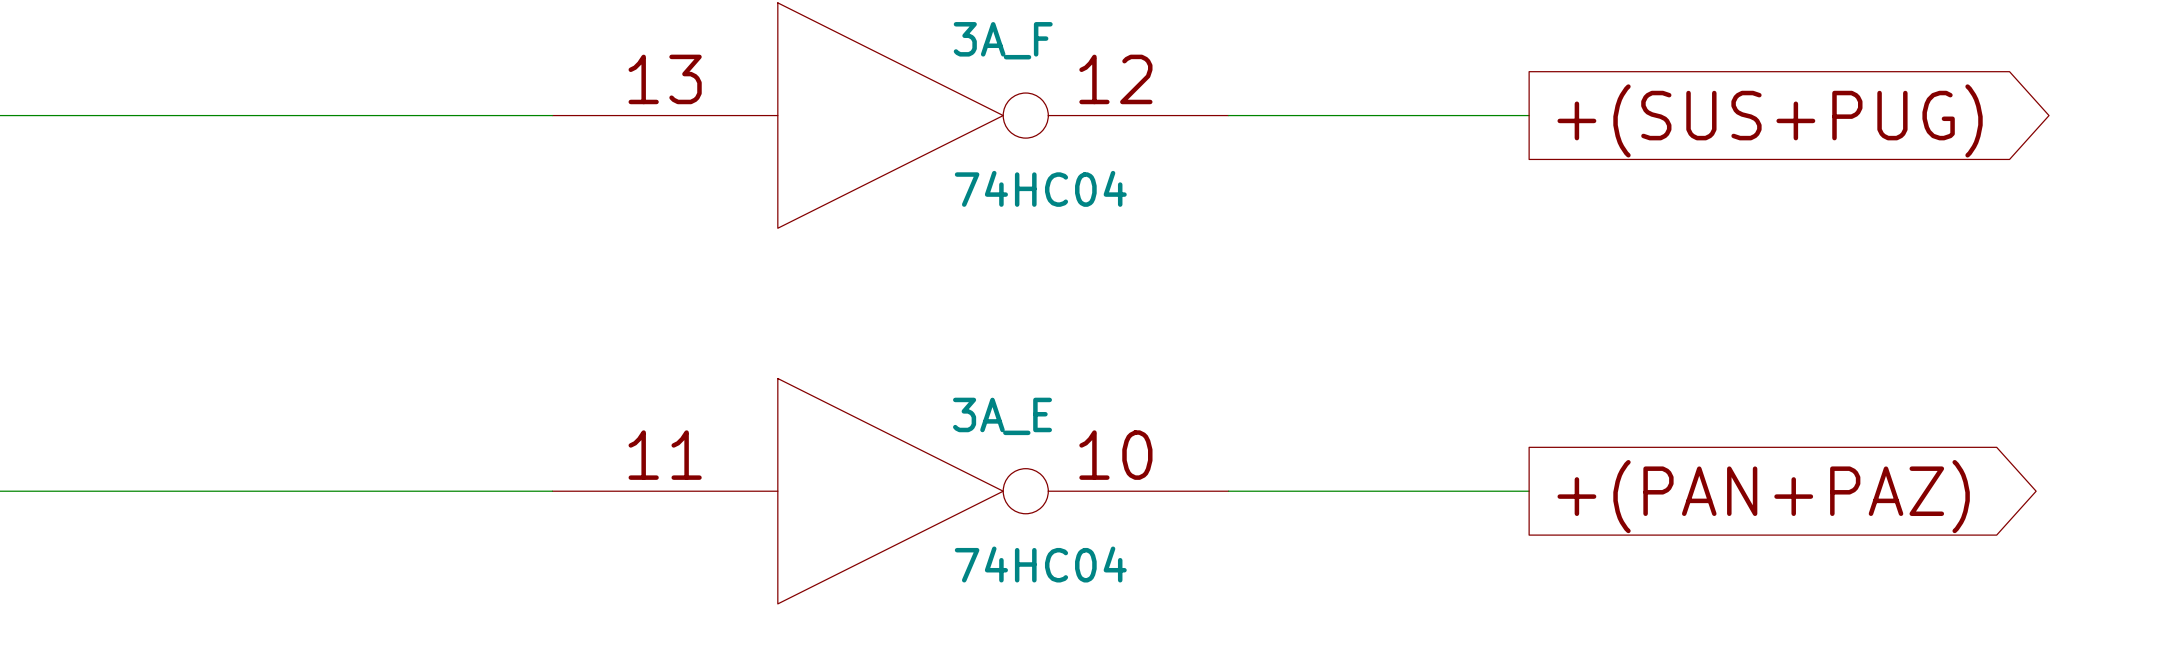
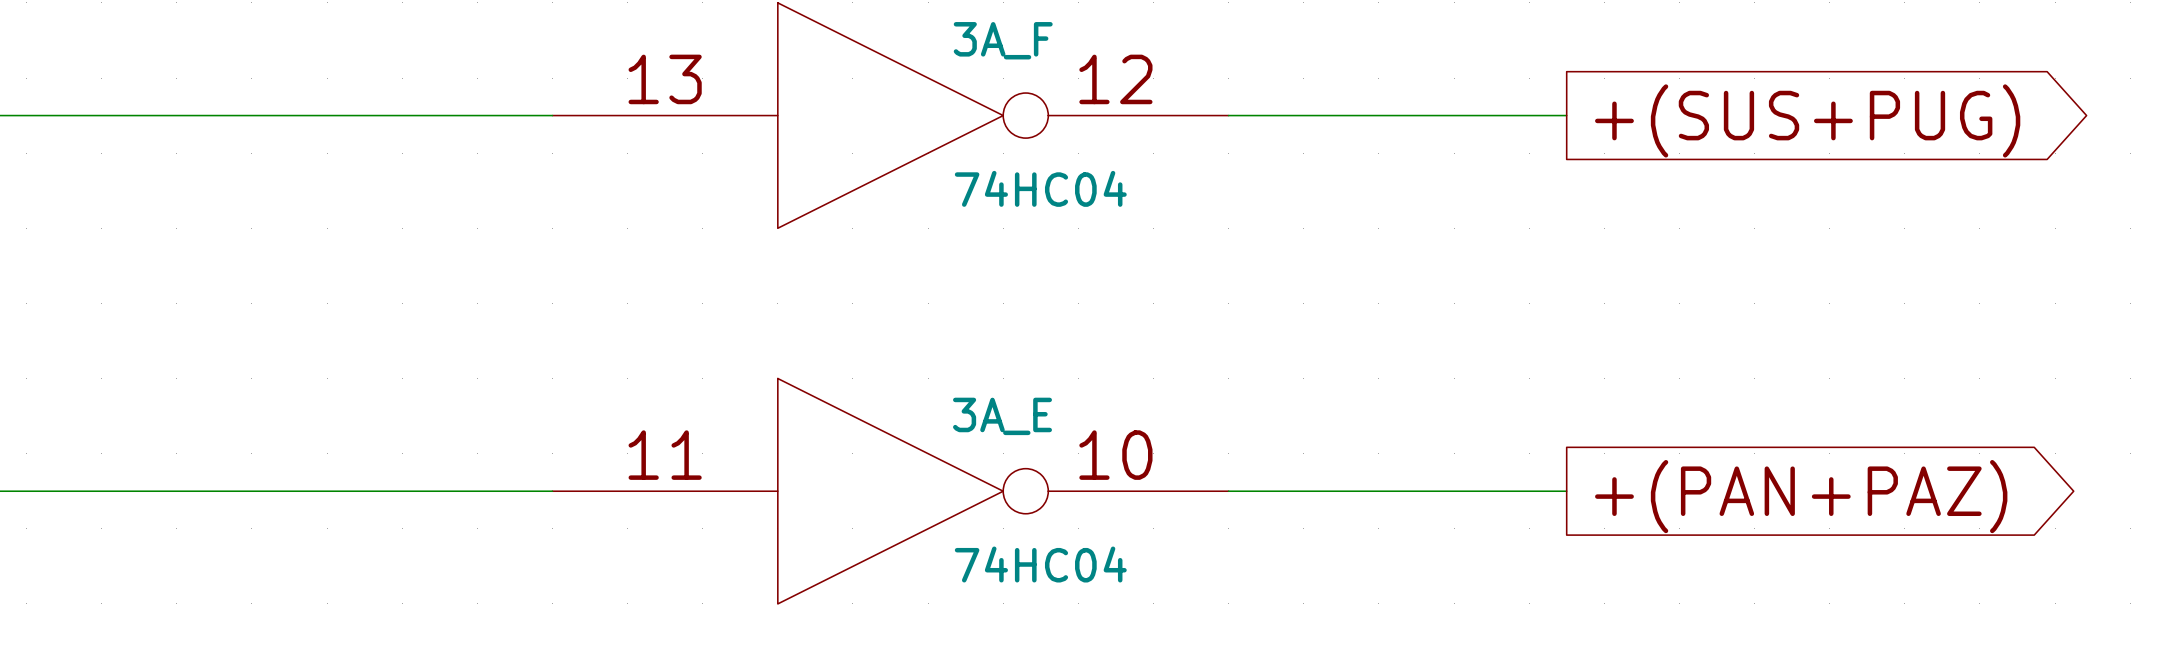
wire: none -> (1529, 115) (1566, 115)
global label position: +(SUS+PUG) (1770, 120) -> +(SUS+PUG) (1807, 120)
wire: none -> (1529, 491) (1566, 491)
global label position: +(PAN+PAZ) (1763, 496) -> +(PAN+PAZ) (1801, 496)

